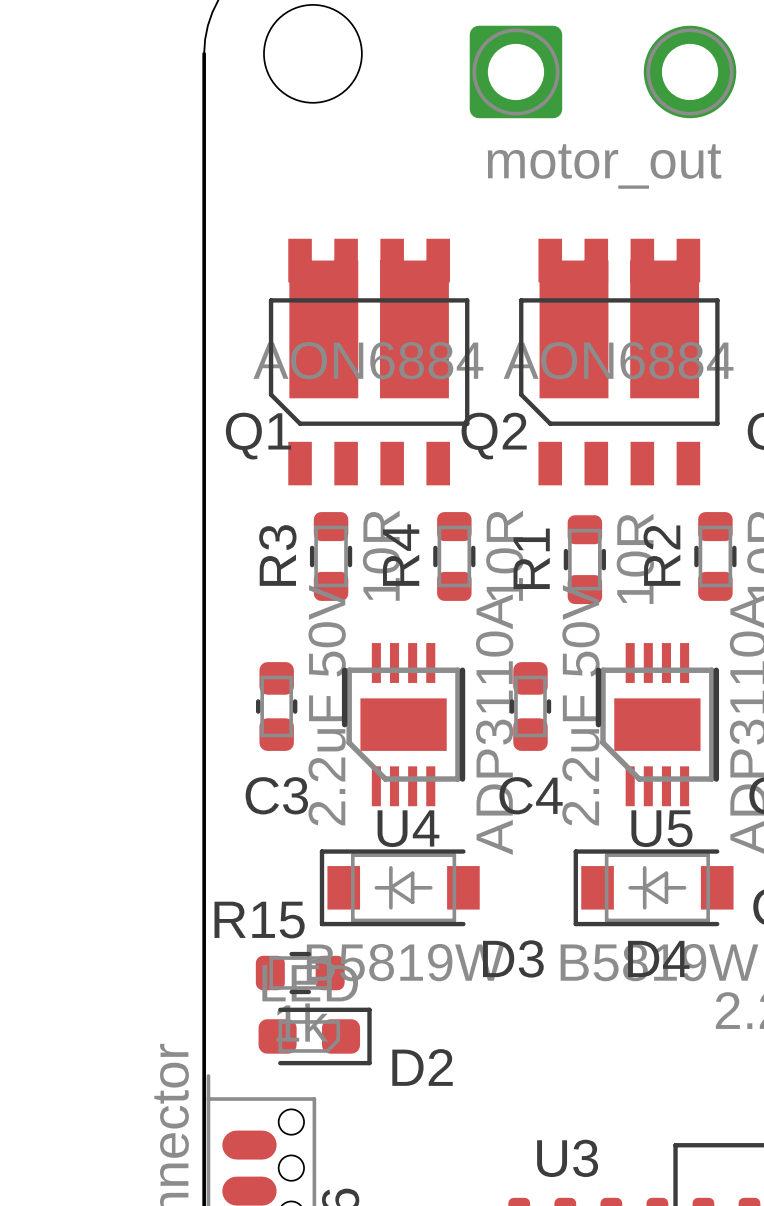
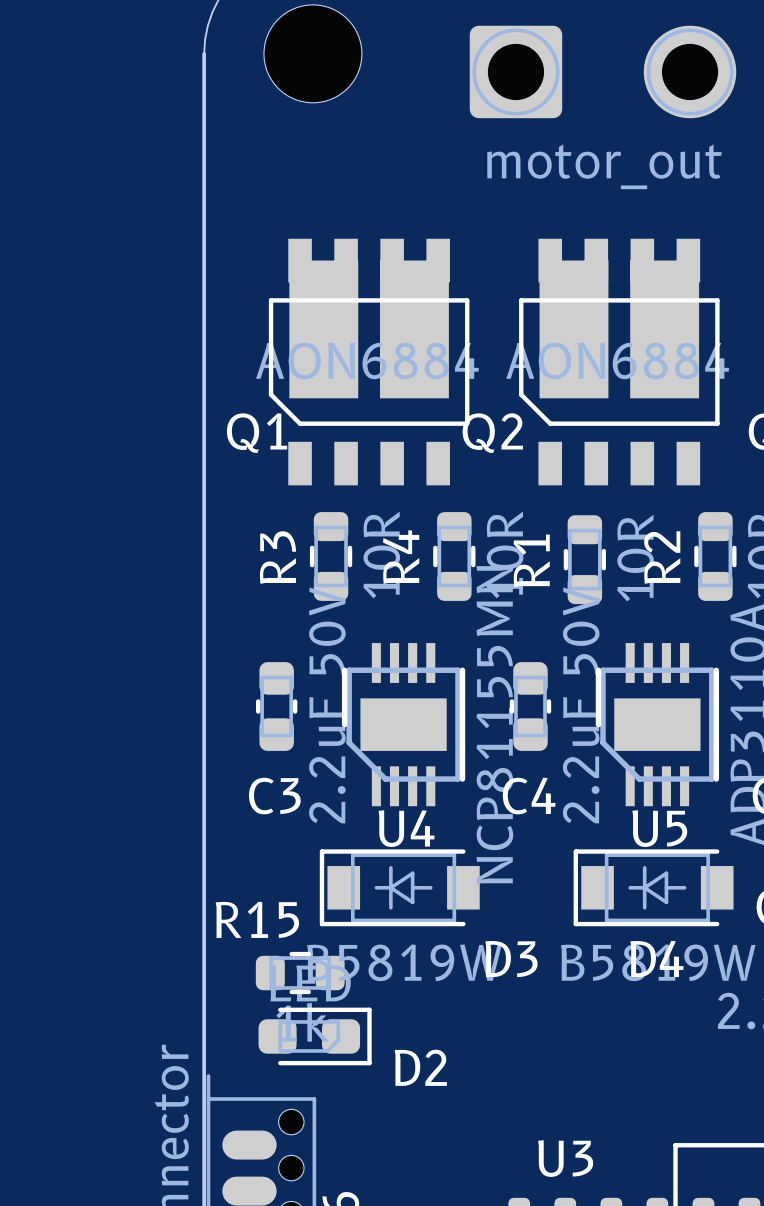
U4 value: ADP3110A (494, 724) -> NCP81155MN (494, 725)

